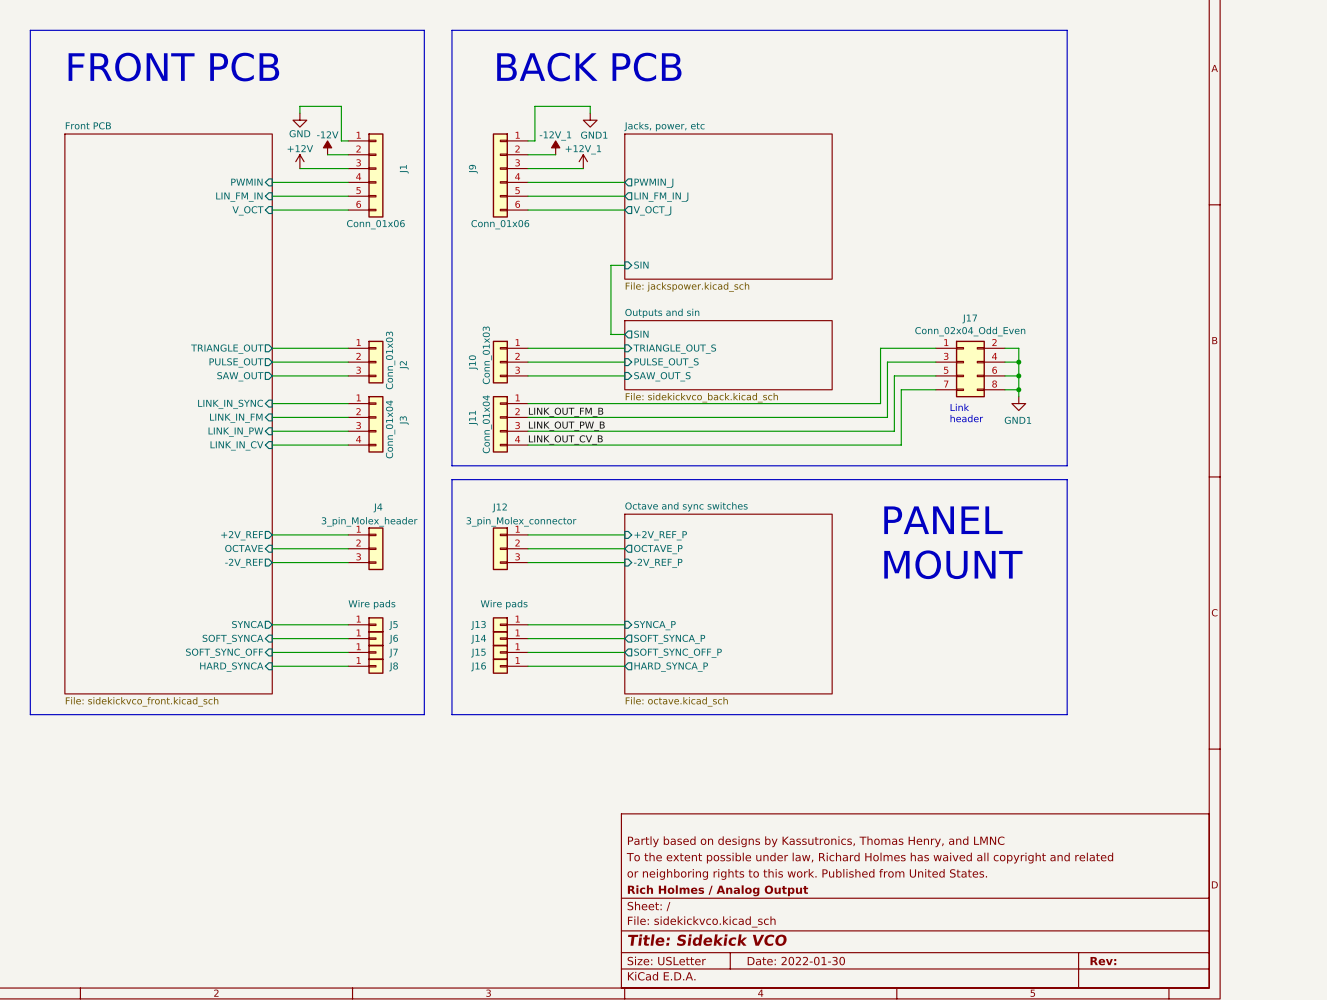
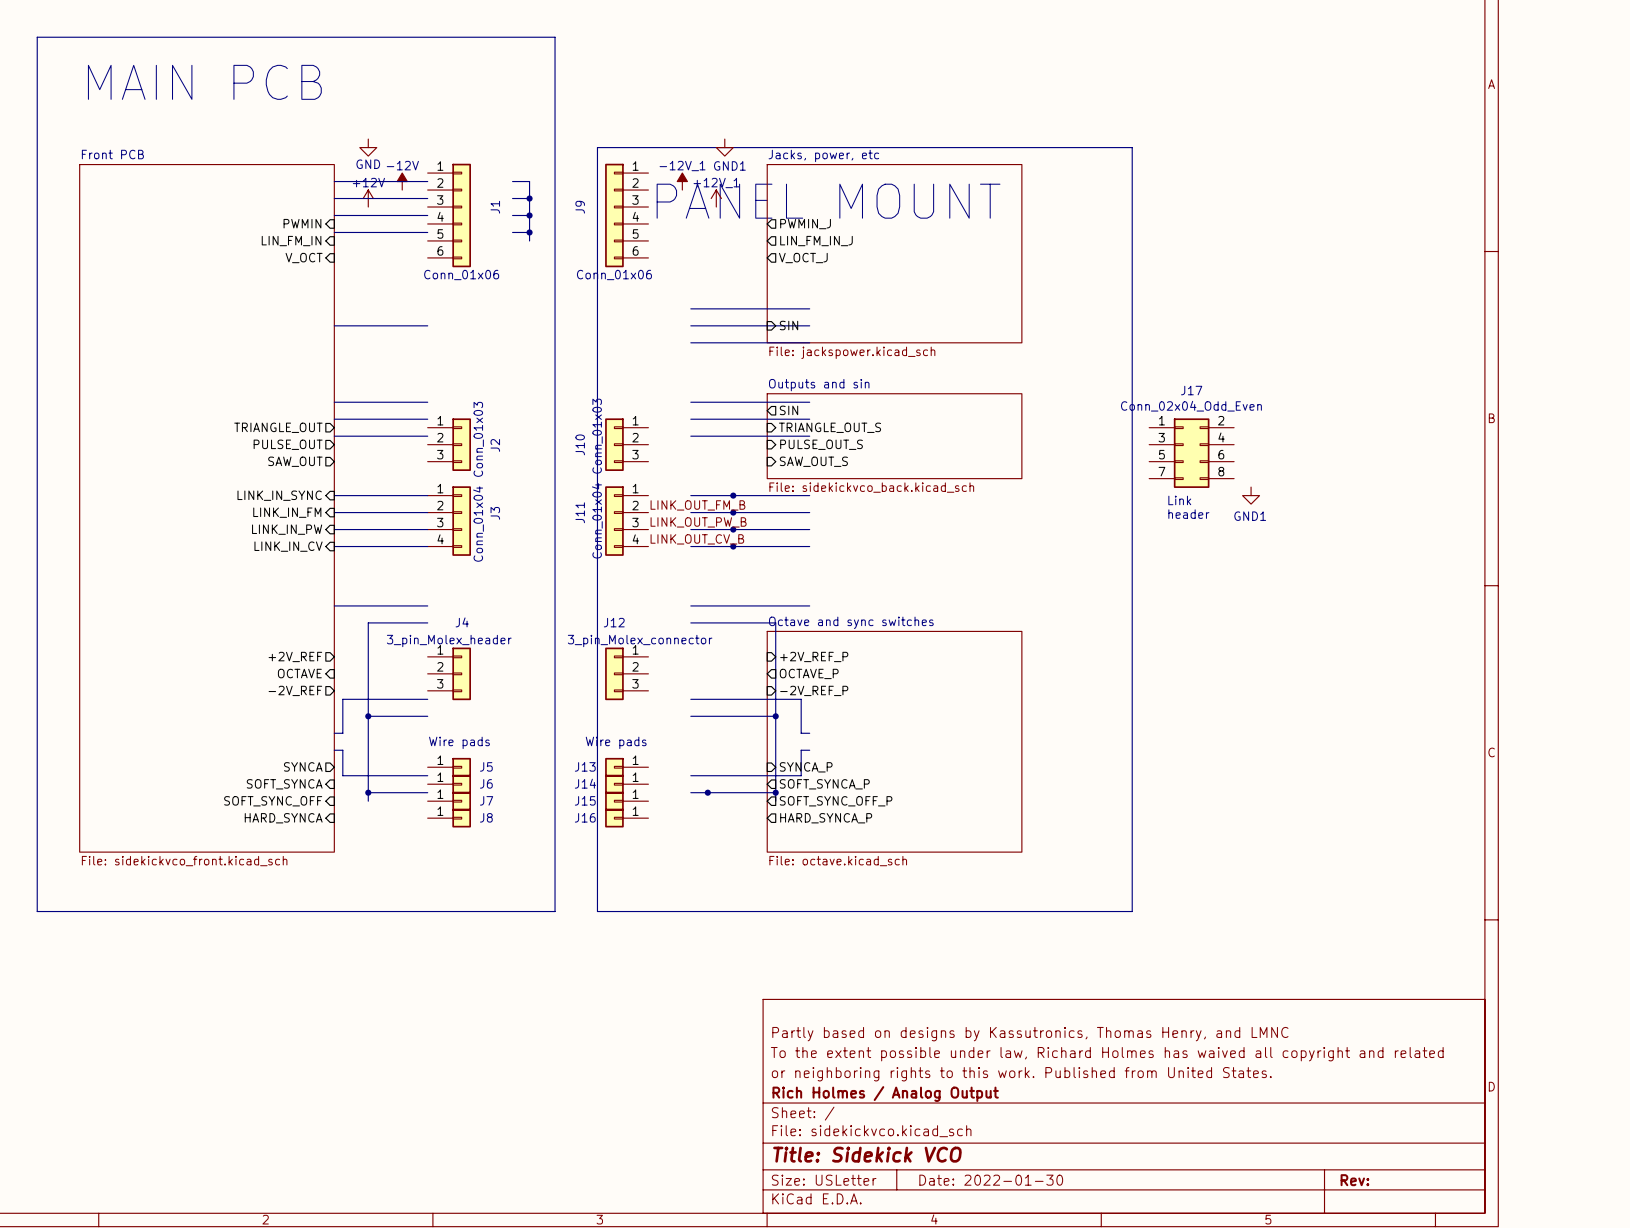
line: (424, 30) (424, 714) (30, 714) -> (555, 877) (555, 911) (37, 911) (37, 877)
line: (451, 30) (1067, 30) (1067, 465) (451, 465) -> (555, 37) (521, 37)
text: FRONT PCB (173, 67) -> MAIN PCB (204, 82)
text: BACK PCB (589, 67) -> none
wire: (299, 113) (299, 106) (341, 106) (341, 140) (348, 140) -> none
wire: (590, 113) (590, 106) (534, 106) (534, 140) (528, 140) -> none
line: none -> (597, 147) (1132, 147) (1132, 911) (597, 911) (597, 147)
wire: none -> (334, 181) (427, 181)
wire: none -> (512, 181) (529, 181) (529, 240)
wire: (327, 154) (348, 154) -> none
wire: (528, 154) (555, 154) -> none
wire: none -> (512, 198) (529, 198)
junction: none -> (529, 198)
text: none -> PANEL MOUNT (828, 201)
wire: (299, 168) (348, 168) -> none
wire: (528, 168) (583, 168) -> none
wire: none -> (512, 215) (529, 215)
junction: none -> (529, 215)
wire: (272, 182) (348, 182) -> (334, 198) (427, 198)
wire: (528, 182) (624, 182) -> (690, 308) (809, 308)
wire: none -> (512, 232) (529, 232)
junction: none -> (529, 232)
wire: (272, 196) (348, 196) -> (334, 215) (427, 215)
wire: (528, 196) (624, 196) -> none
wire: (272, 210) (348, 210) -> (334, 232) (427, 232)
wire: (528, 210) (624, 210) -> (690, 342) (809, 342)
wire: none -> (334, 325) (427, 325)
wire: (610, 265) (610, 334) (624, 334) -> (750, 325) (690, 325)
wire: none -> (767, 325) (809, 325)
wire: (272, 348) (348, 348) -> (334, 402) (427, 402)
wire: (528, 348) (624, 348) -> (690, 402) (809, 402)
wire: (935, 348) (880, 348) (880, 403) (659, 403) -> none
wire: (1004, 348) (1018, 348) (1018, 396) -> none
wire: (272, 362) (348, 362) -> (334, 419) (427, 419)
wire: (528, 362) (624, 362) -> (690, 419) (809, 419)
wire: (935, 362) (887, 362) (887, 417) (659, 417) -> none
wire: (1004, 362) (1018, 362) -> none
junction: (1018, 362) -> none
wire: (272, 375) (348, 375) -> (334, 436) (427, 436)
wire: (528, 375) (624, 375) -> (690, 436) (809, 436)
wire: (935, 375) (894, 375) (894, 431) (659, 431) -> none
wire: (1004, 375) (1018, 375) -> none
junction: (1018, 375) -> none
wire: (935, 389) (901, 389) (901, 445) (659, 445) -> none
wire: (1004, 389) (1018, 389) -> none
junction: (1018, 389) -> none
wire: (528, 403) (562, 403) -> none
junction: none -> (733, 495)
wire: (528, 417) (562, 417) -> none
junction: none -> (733, 512)
wire: (528, 431) (562, 431) -> none
junction: none -> (733, 529)
wire: (528, 445) (562, 445) -> none
junction: none -> (733, 546)
line: (451, 479) (1067, 479) (1067, 714) (451, 714) -> (555, 588) (555, 572)
wire: none -> (427, 622) (368, 622) (368, 801)
wire: none -> (690, 622) (775, 622) (775, 801)
text: PANEL (943, 520) -> none
wire: (272, 534) (348, 534) -> (334, 605) (427, 605)
wire: (528, 534) (624, 534) -> none
wire: (272, 548) (348, 548) -> none
wire: (528, 548) (624, 548) -> none
wire: (272, 562) (348, 562) -> none
wire: (528, 562) (624, 562) -> (690, 605) (809, 605)
text: MOUNT (953, 564) -> none
wire: none -> (427, 699) (342, 699) (342, 733) (334, 733)
wire: none -> (690, 699) (801, 699) (801, 733) (809, 733)
wire: none -> (368, 716) (427, 716)
junction: none -> (368, 716)
wire: none -> (690, 716) (775, 716)
junction: none -> (775, 716)
wire: none -> (334, 750) (342, 750) (342, 775) (427, 775)
wire: none -> (809, 750) (801, 750) (801, 775) (690, 775)
wire: (272, 624) (348, 624) -> none
wire: (528, 624) (624, 624) -> none
wire: (272, 638) (348, 638) -> none
wire: (528, 638) (624, 638) -> none
wire: none -> (368, 792) (427, 792)
junction: none -> (368, 792)
wire: none -> (690, 792) (775, 792)
junction: none -> (707, 792)
junction: none -> (775, 792)
wire: (272, 652) (348, 652) -> none
wire: (528, 652) (624, 652) -> none
wire: (272, 666) (348, 666) -> none
wire: (528, 666) (624, 666) -> none

